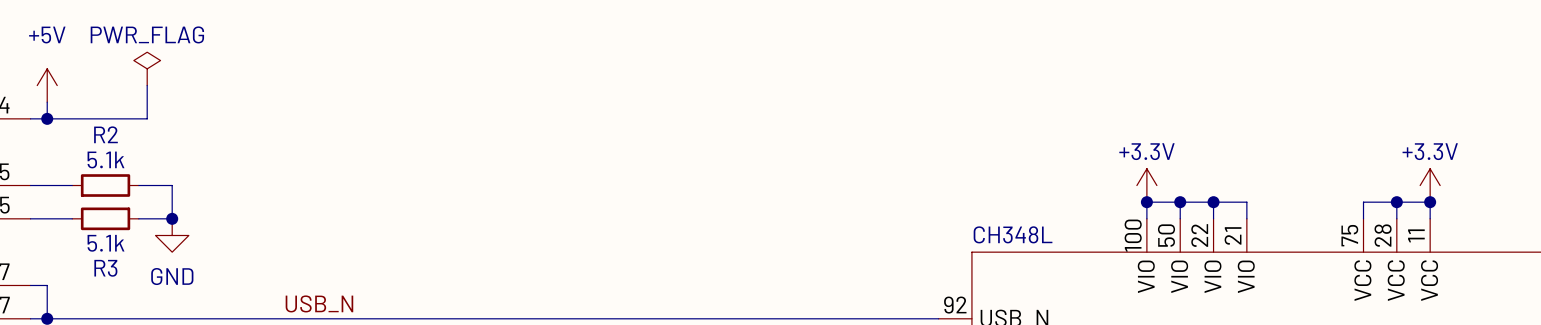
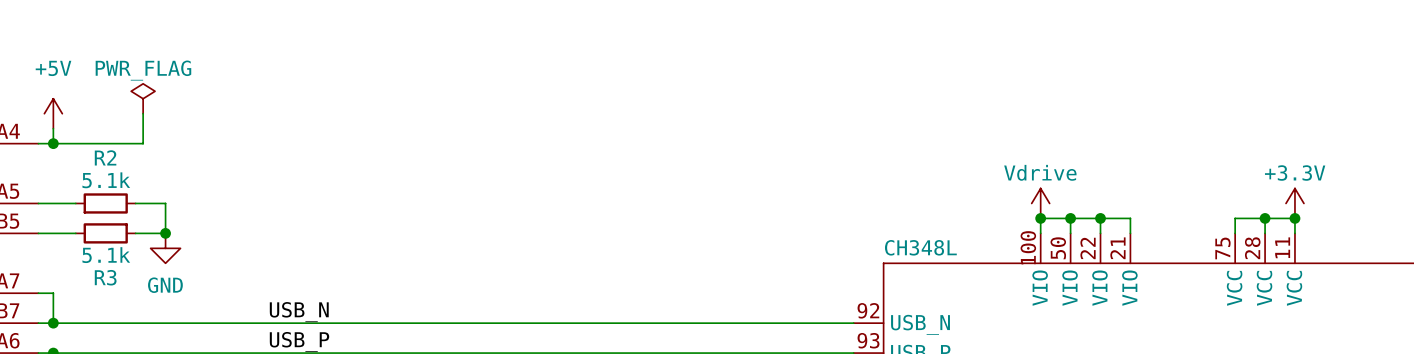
power symbol: +3.3V (1146, 185) -> Vdrive (1040, 203)

